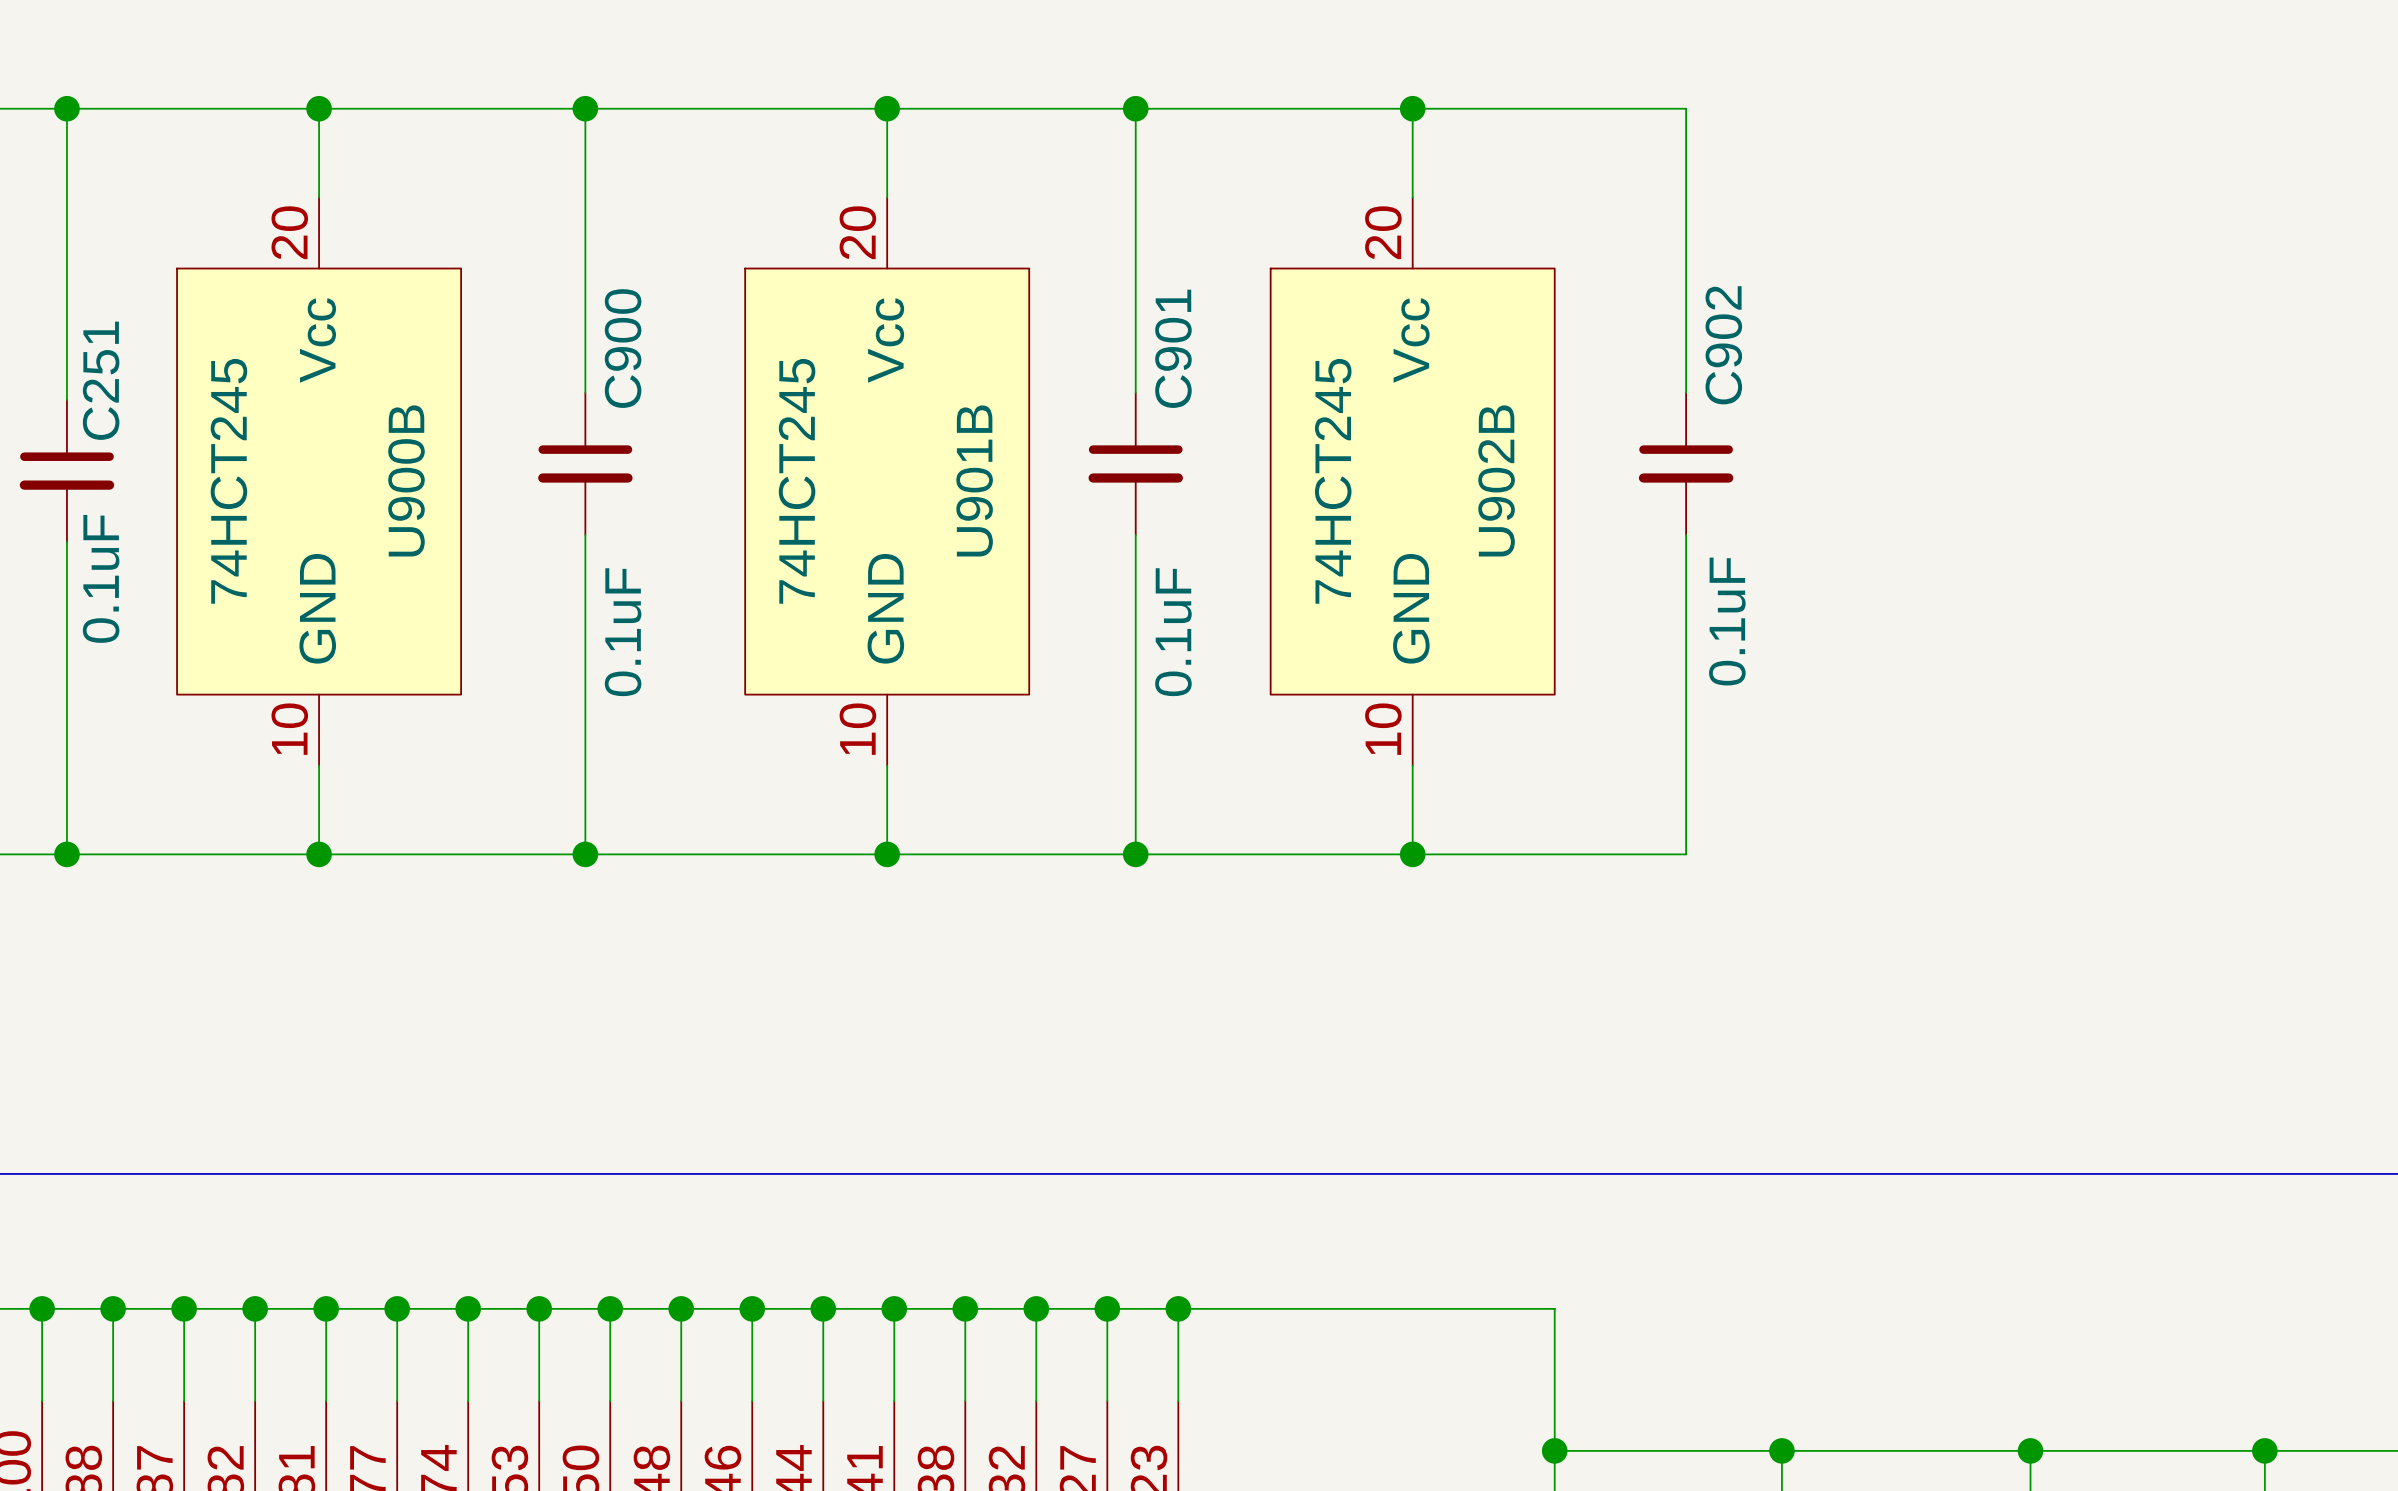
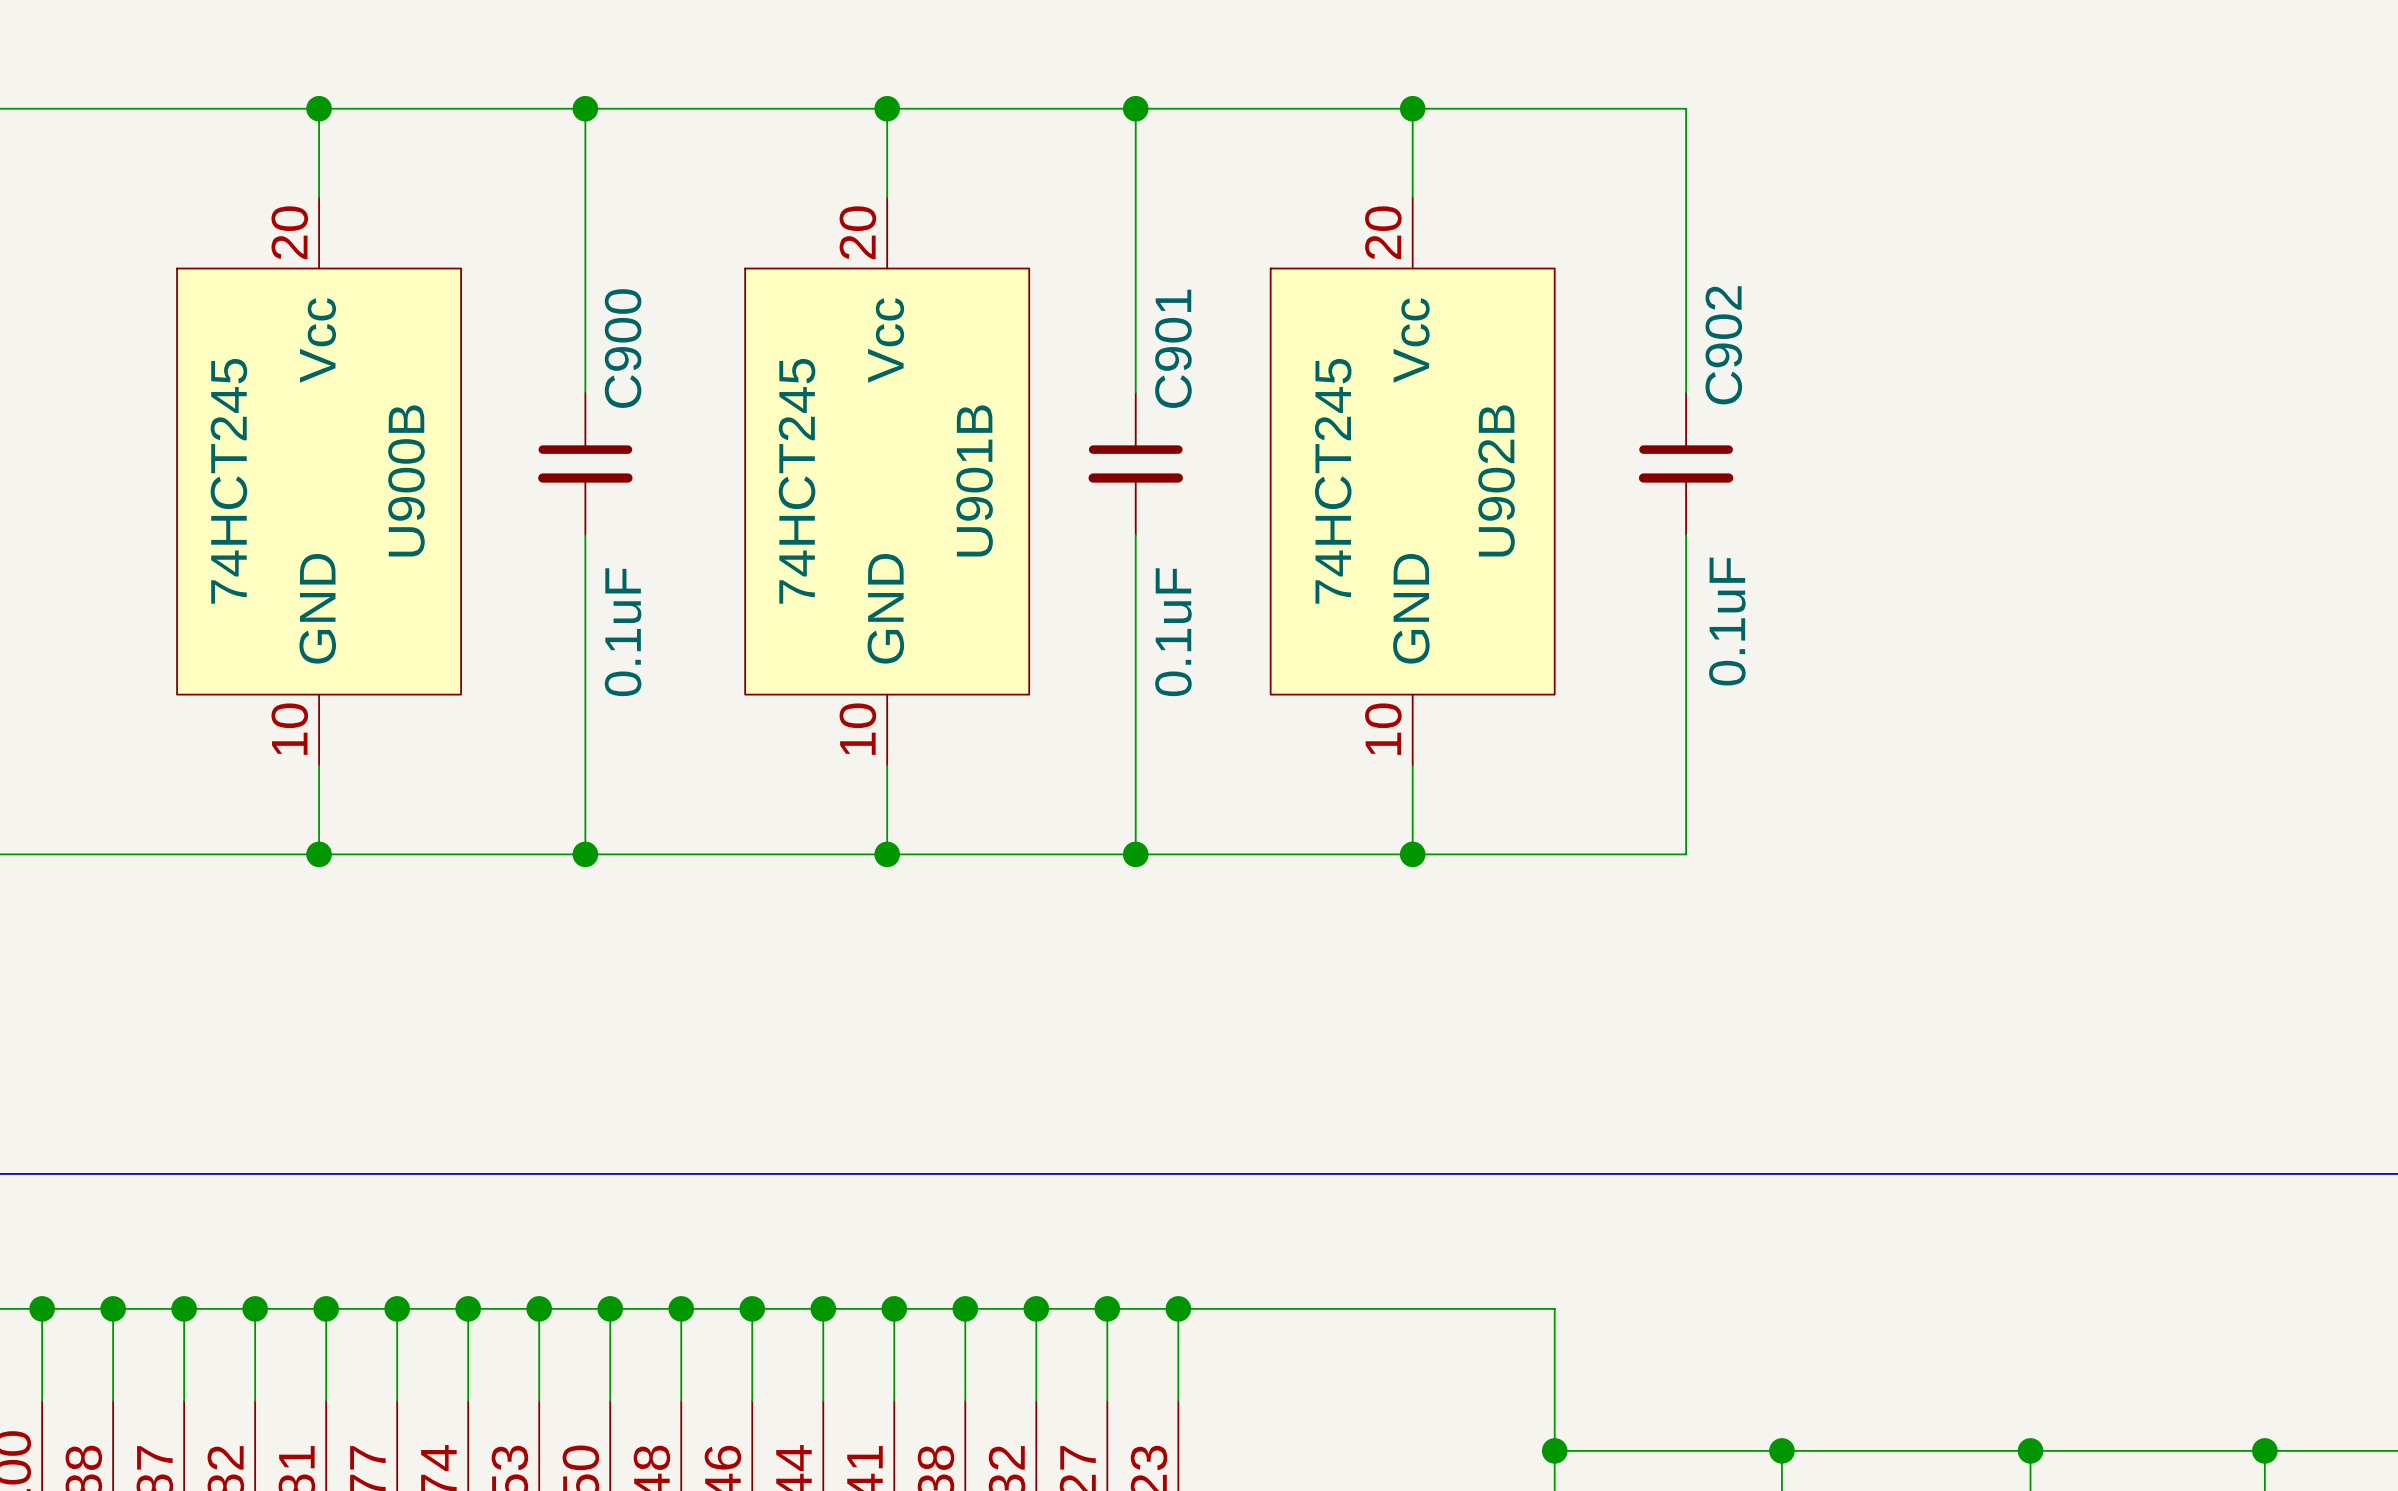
wire: (66, 108) (66, 399) -> none
junction: (66, 108) -> none
C251: 0.1uF (66, 470) -> none
wire: (66, 541) (66, 854) -> none
junction: (66, 854) -> none

